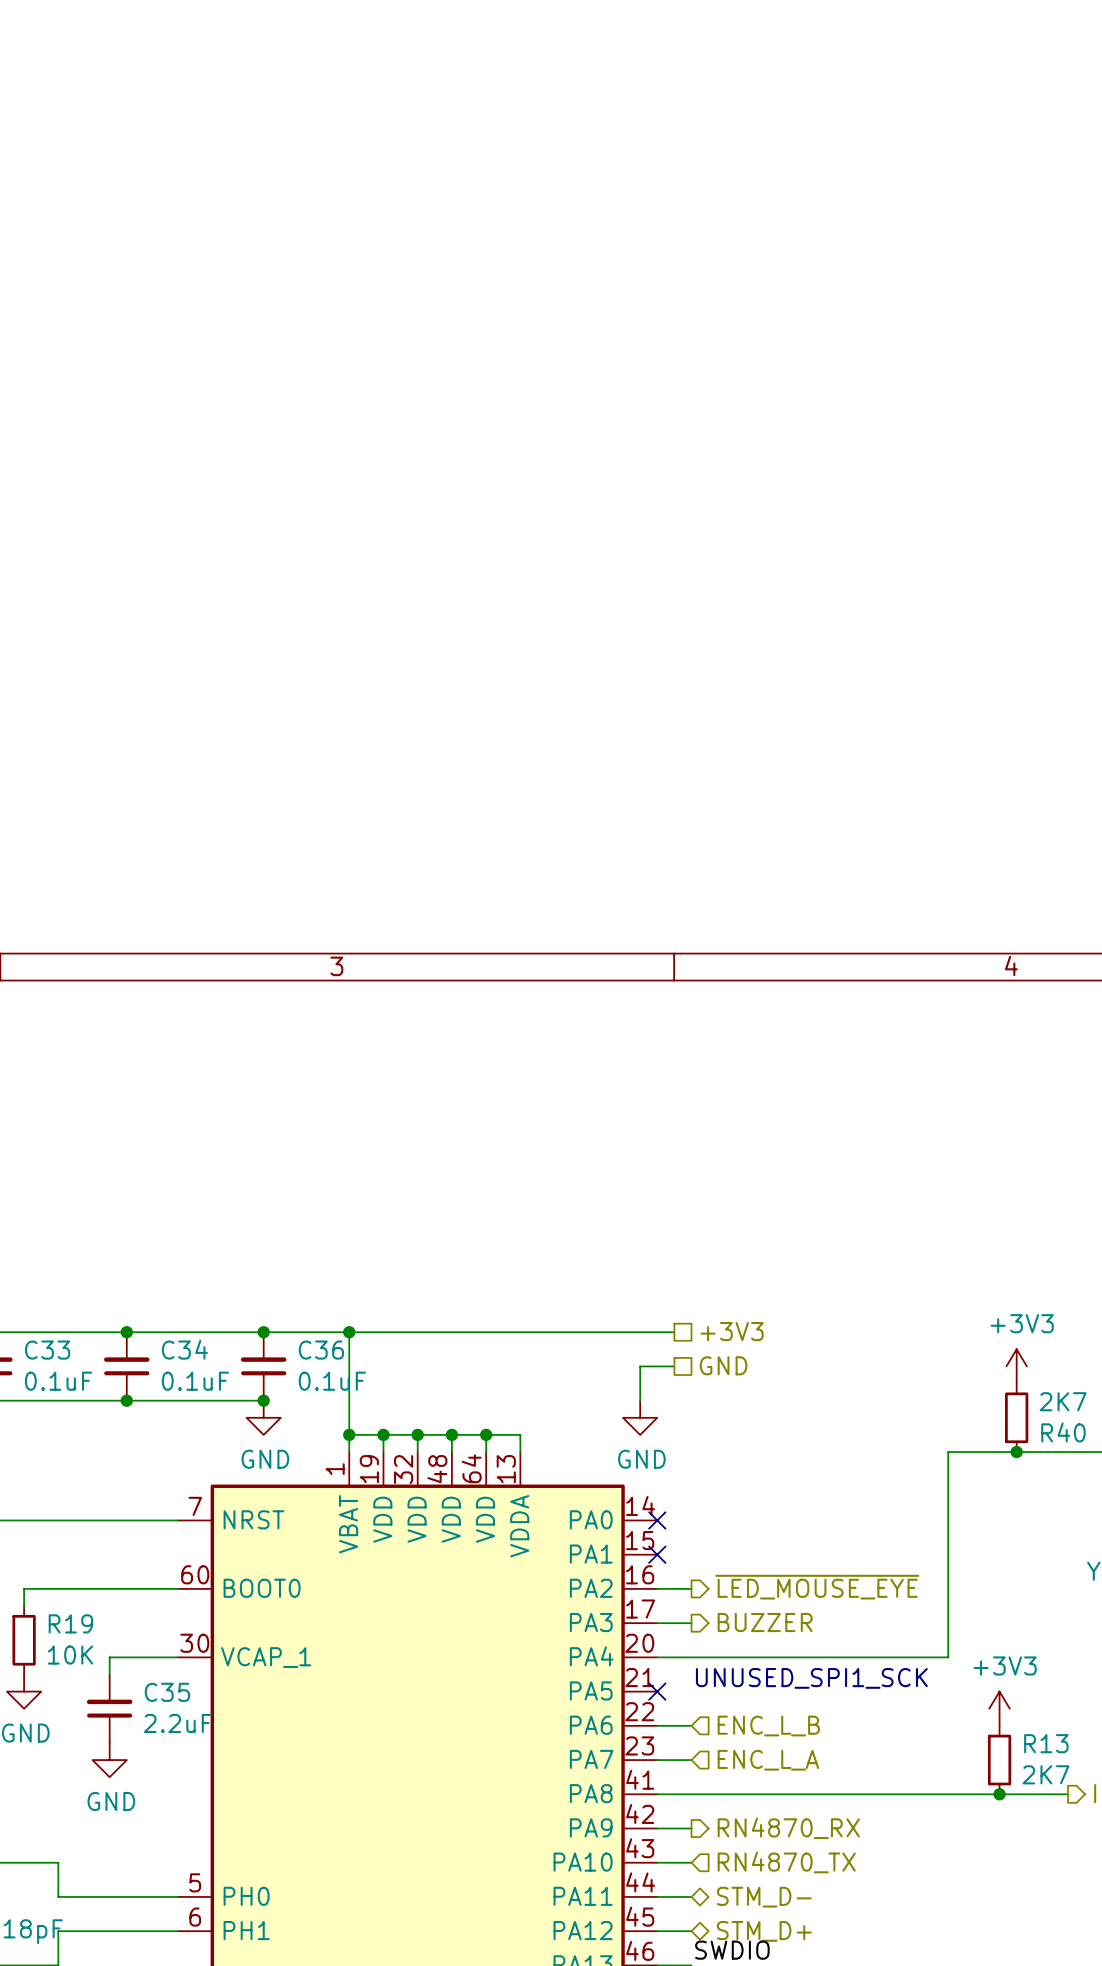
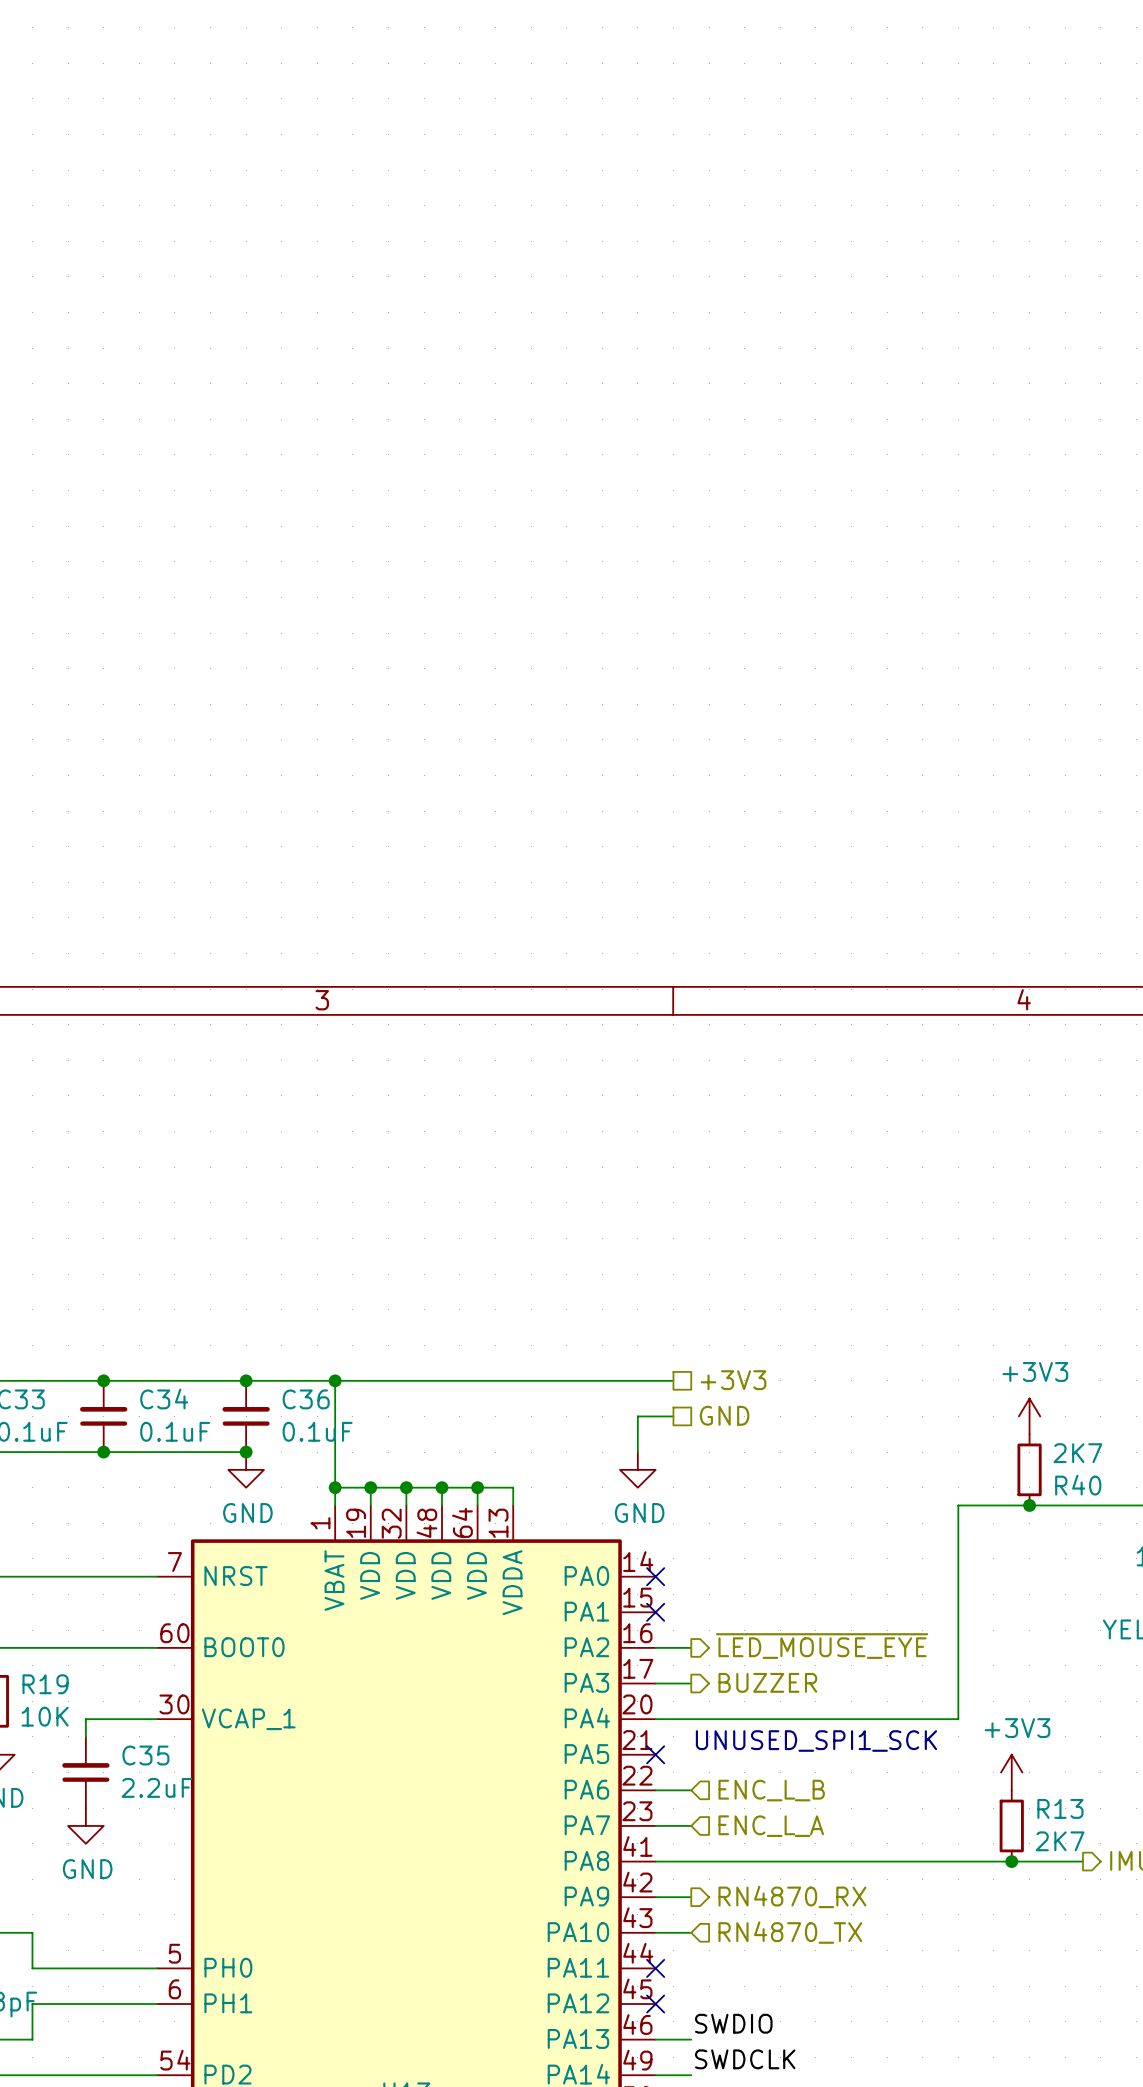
wire: (657, 1896) (691, 1896) -> none
no-connect mark: none -> (655, 1968)
hierarchical label: STM_D- (764, 1897) -> none
wire: (657, 1931) (691, 1931) -> none
no-connect mark: none -> (655, 2004)
hierarchical label: STM_D+ (764, 1931) -> none

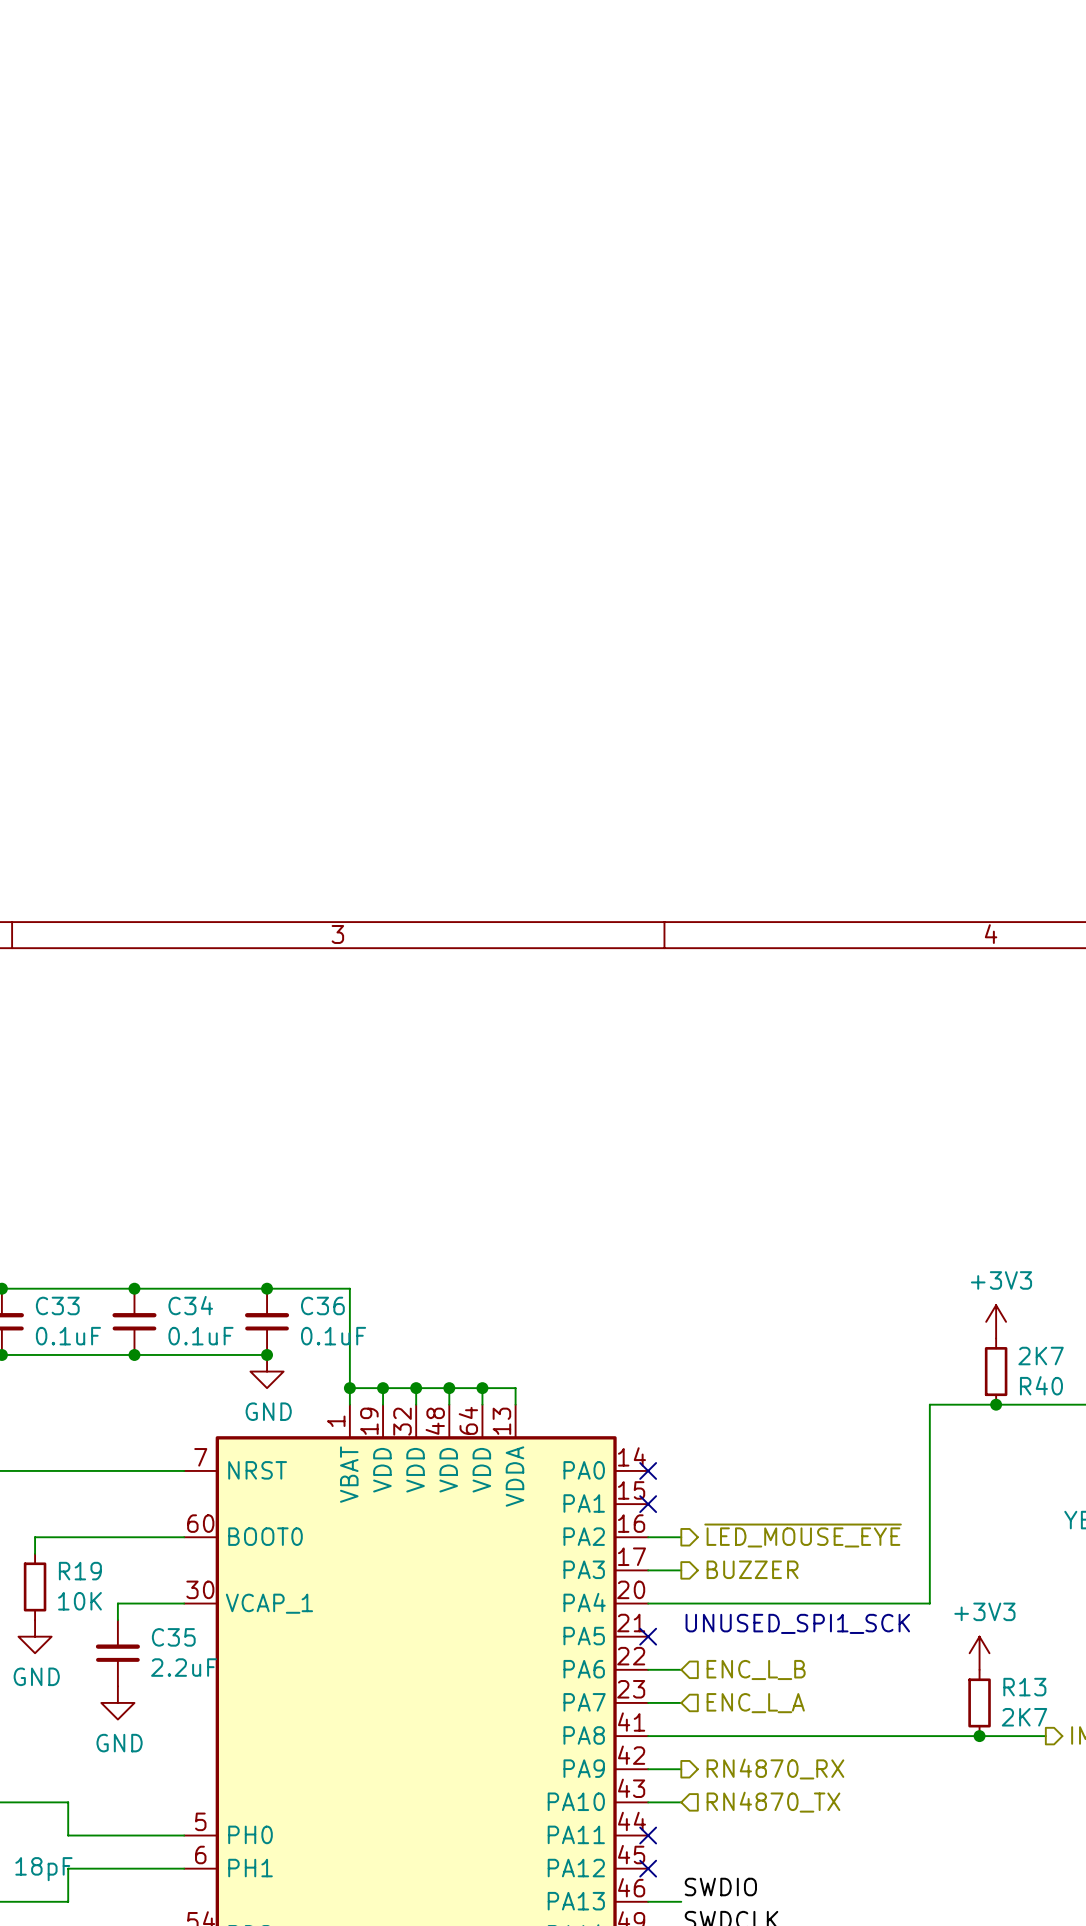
wire: (335, 1380) (673, 1380) -> none
junction: (335, 1380) -> none
hierarchical label: +3V3 (733, 1380) -> none
hierarchical label: GND (724, 1415) -> none
wire: (673, 1416) (637, 1416) (637, 1452) -> none
power symbol: GND (637, 1469) -> none

